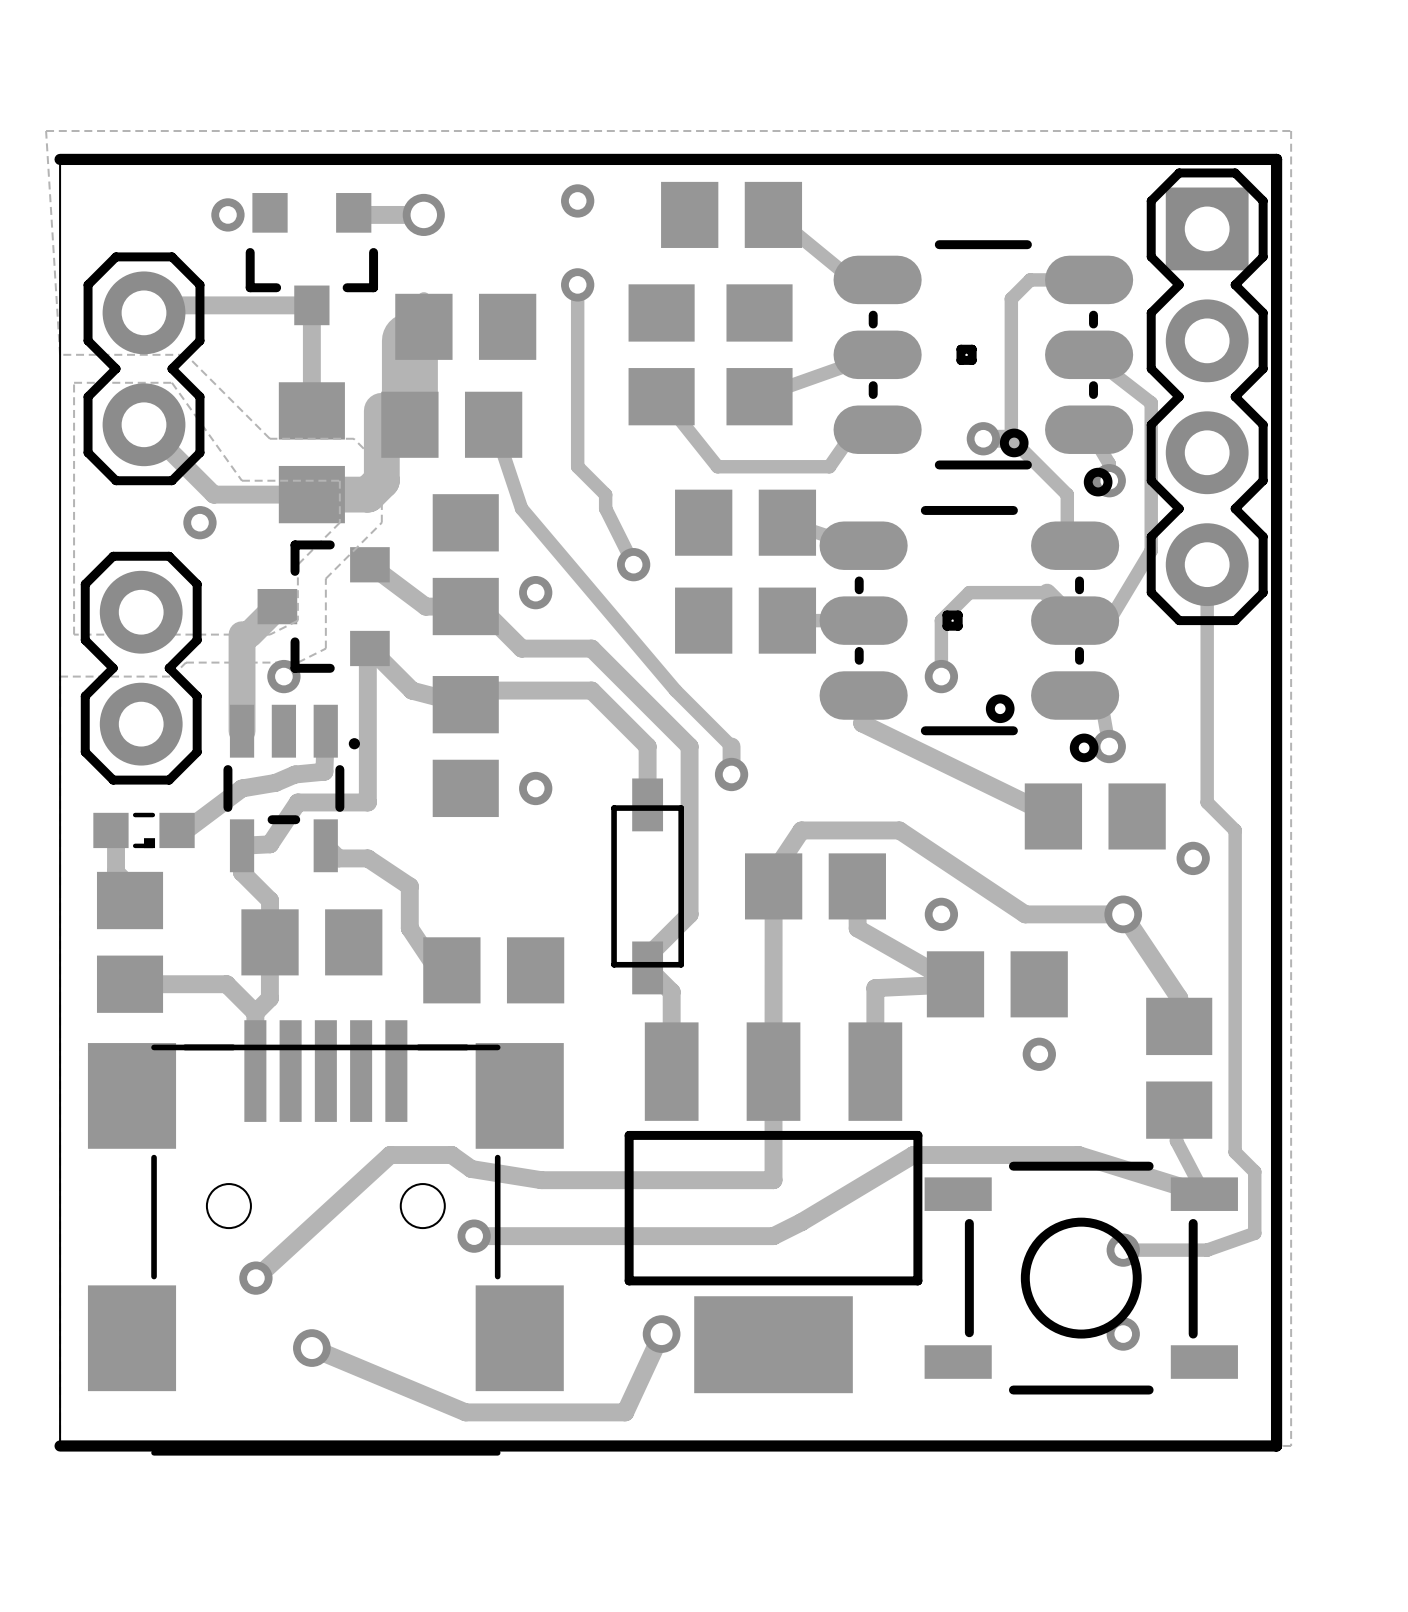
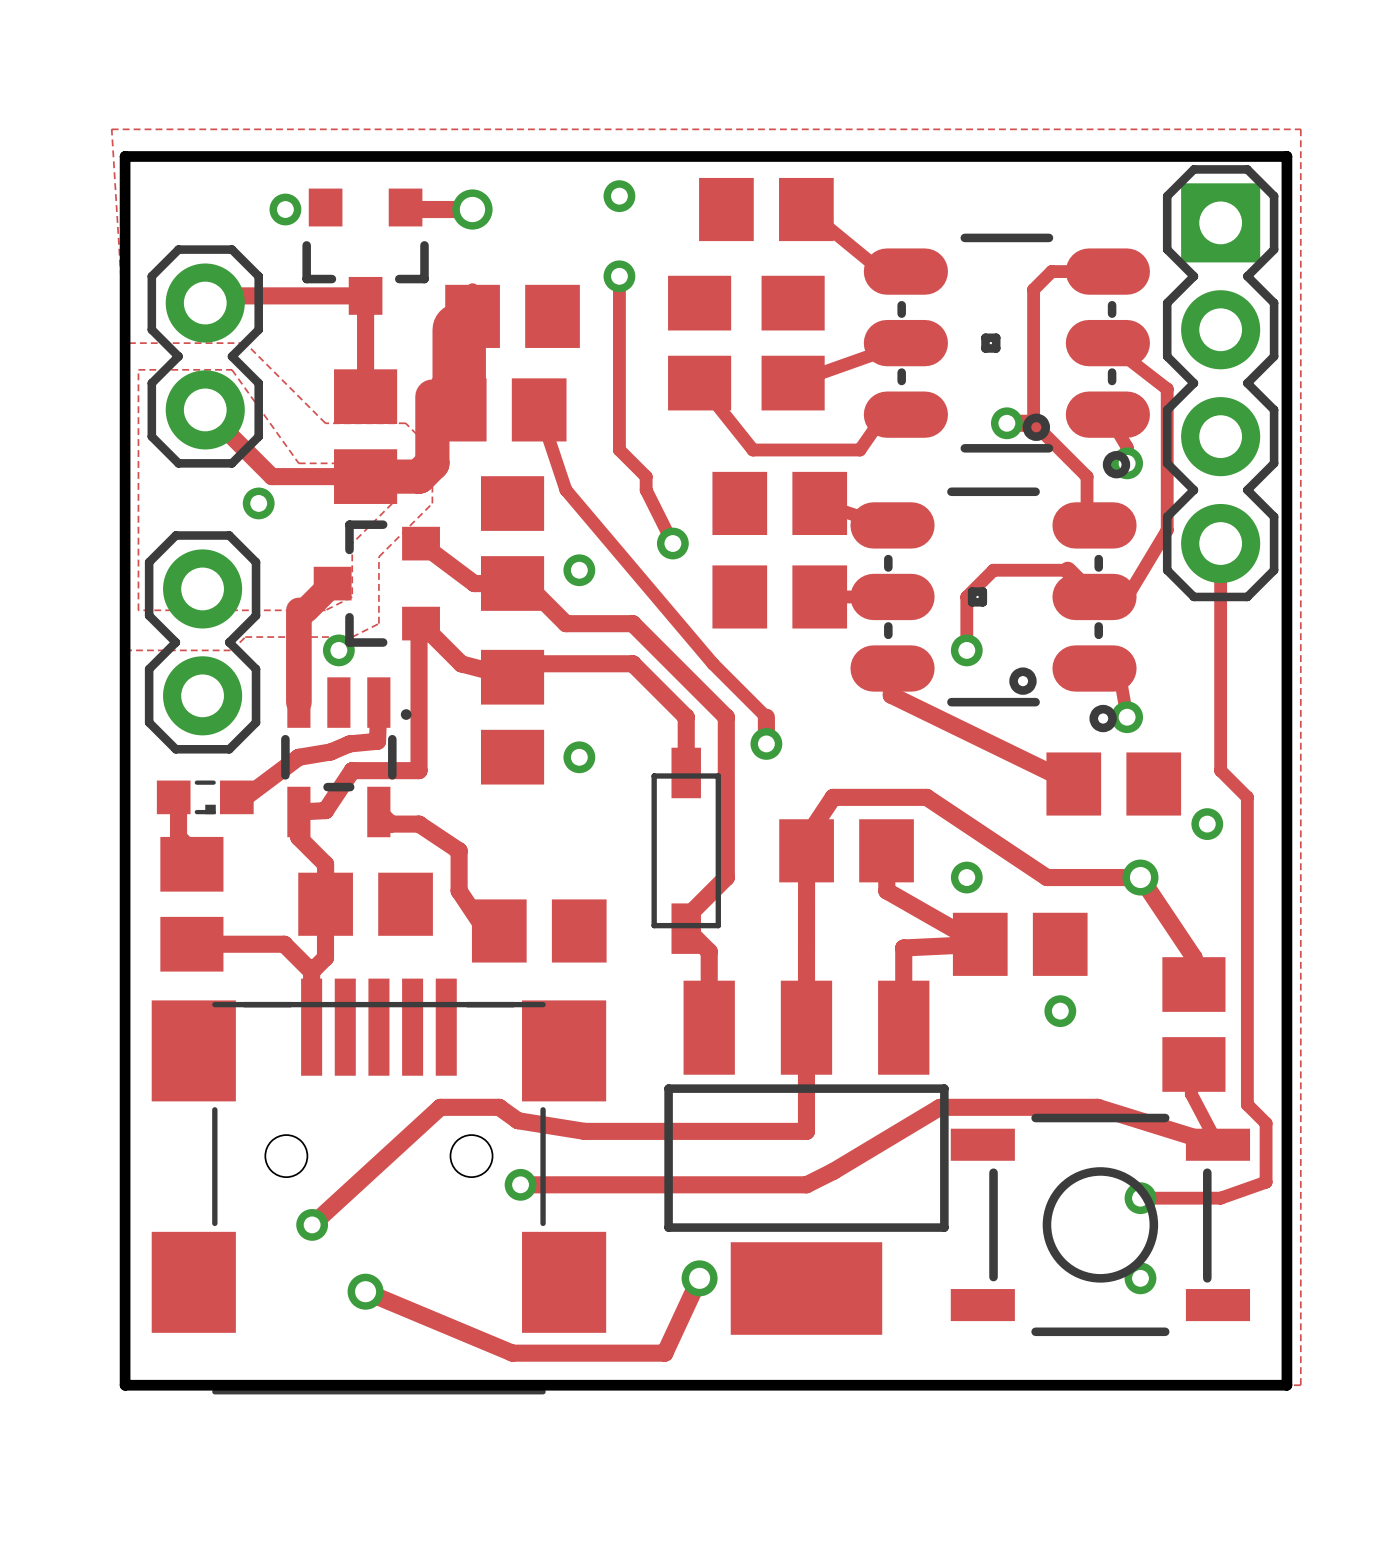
board edge width: thin (60, 159) (60, 1445) -> thick (125, 156) (125, 1385)

